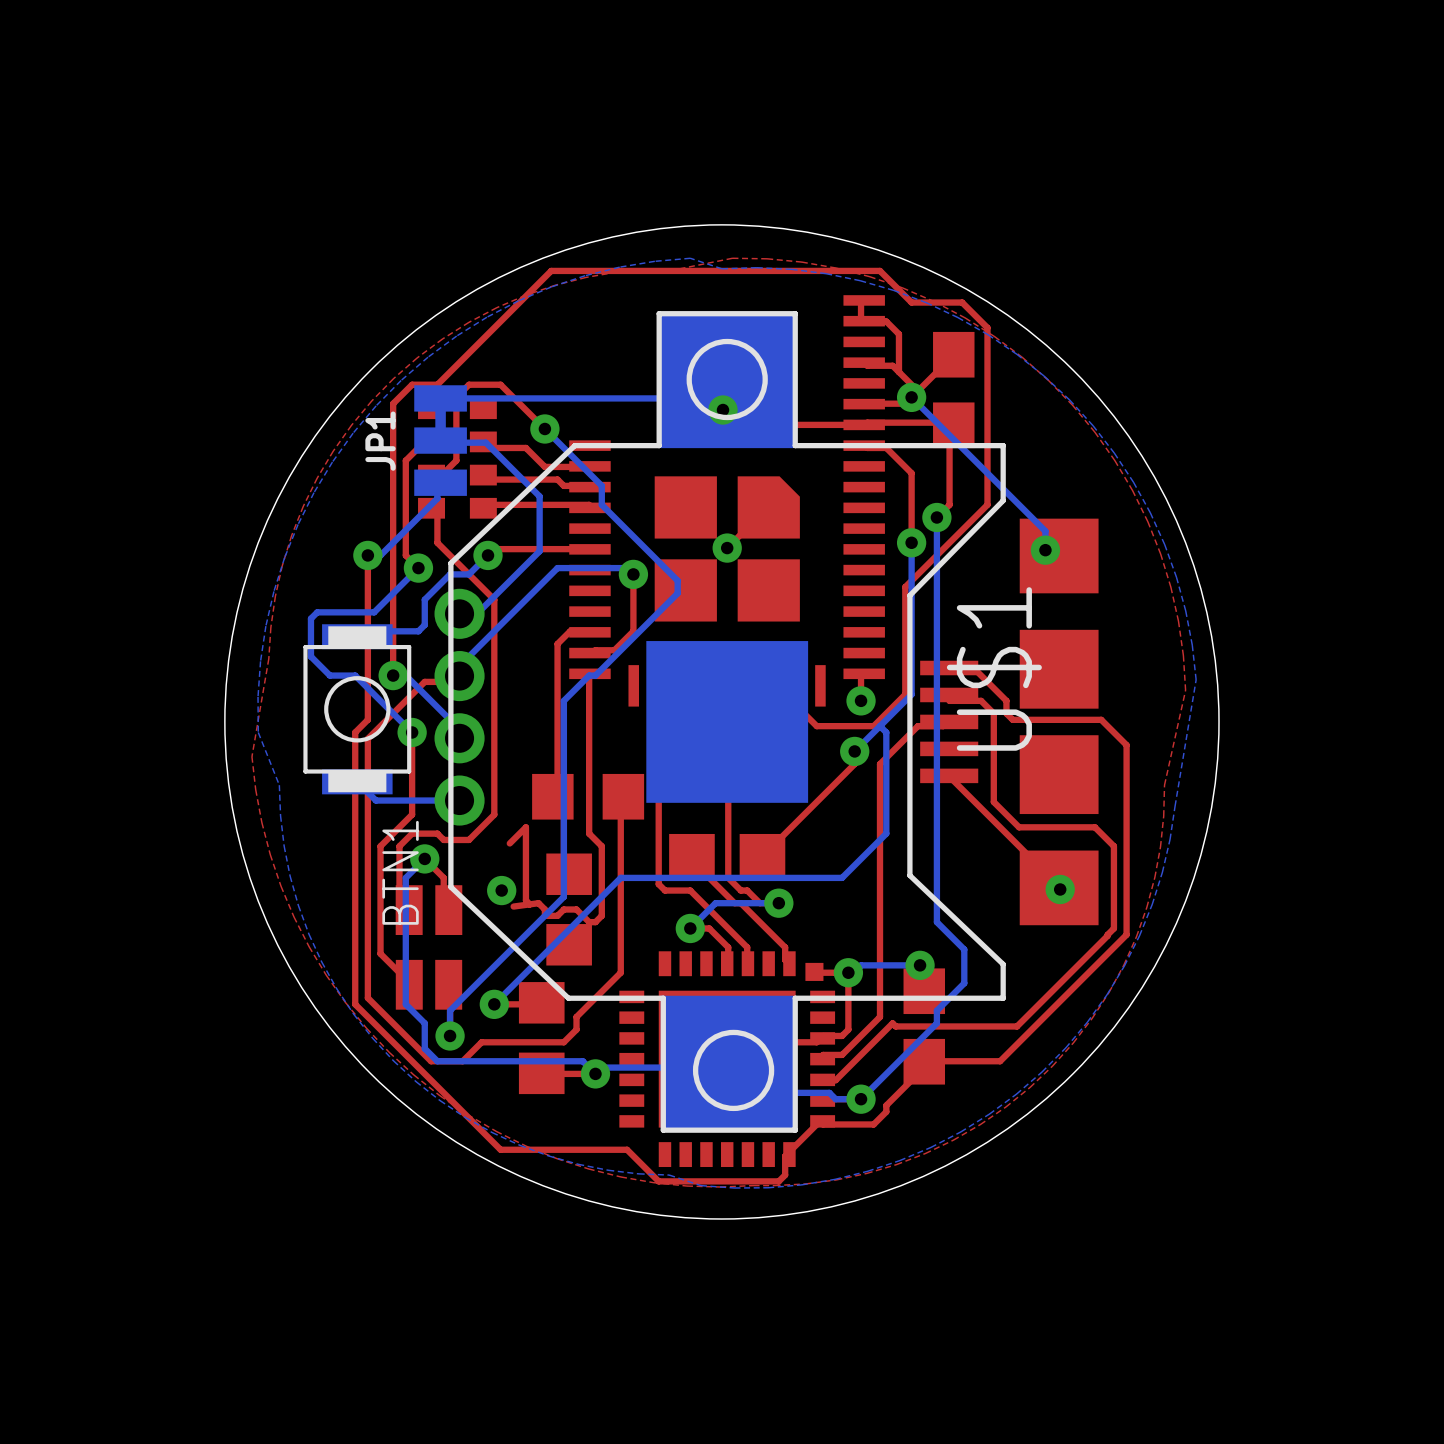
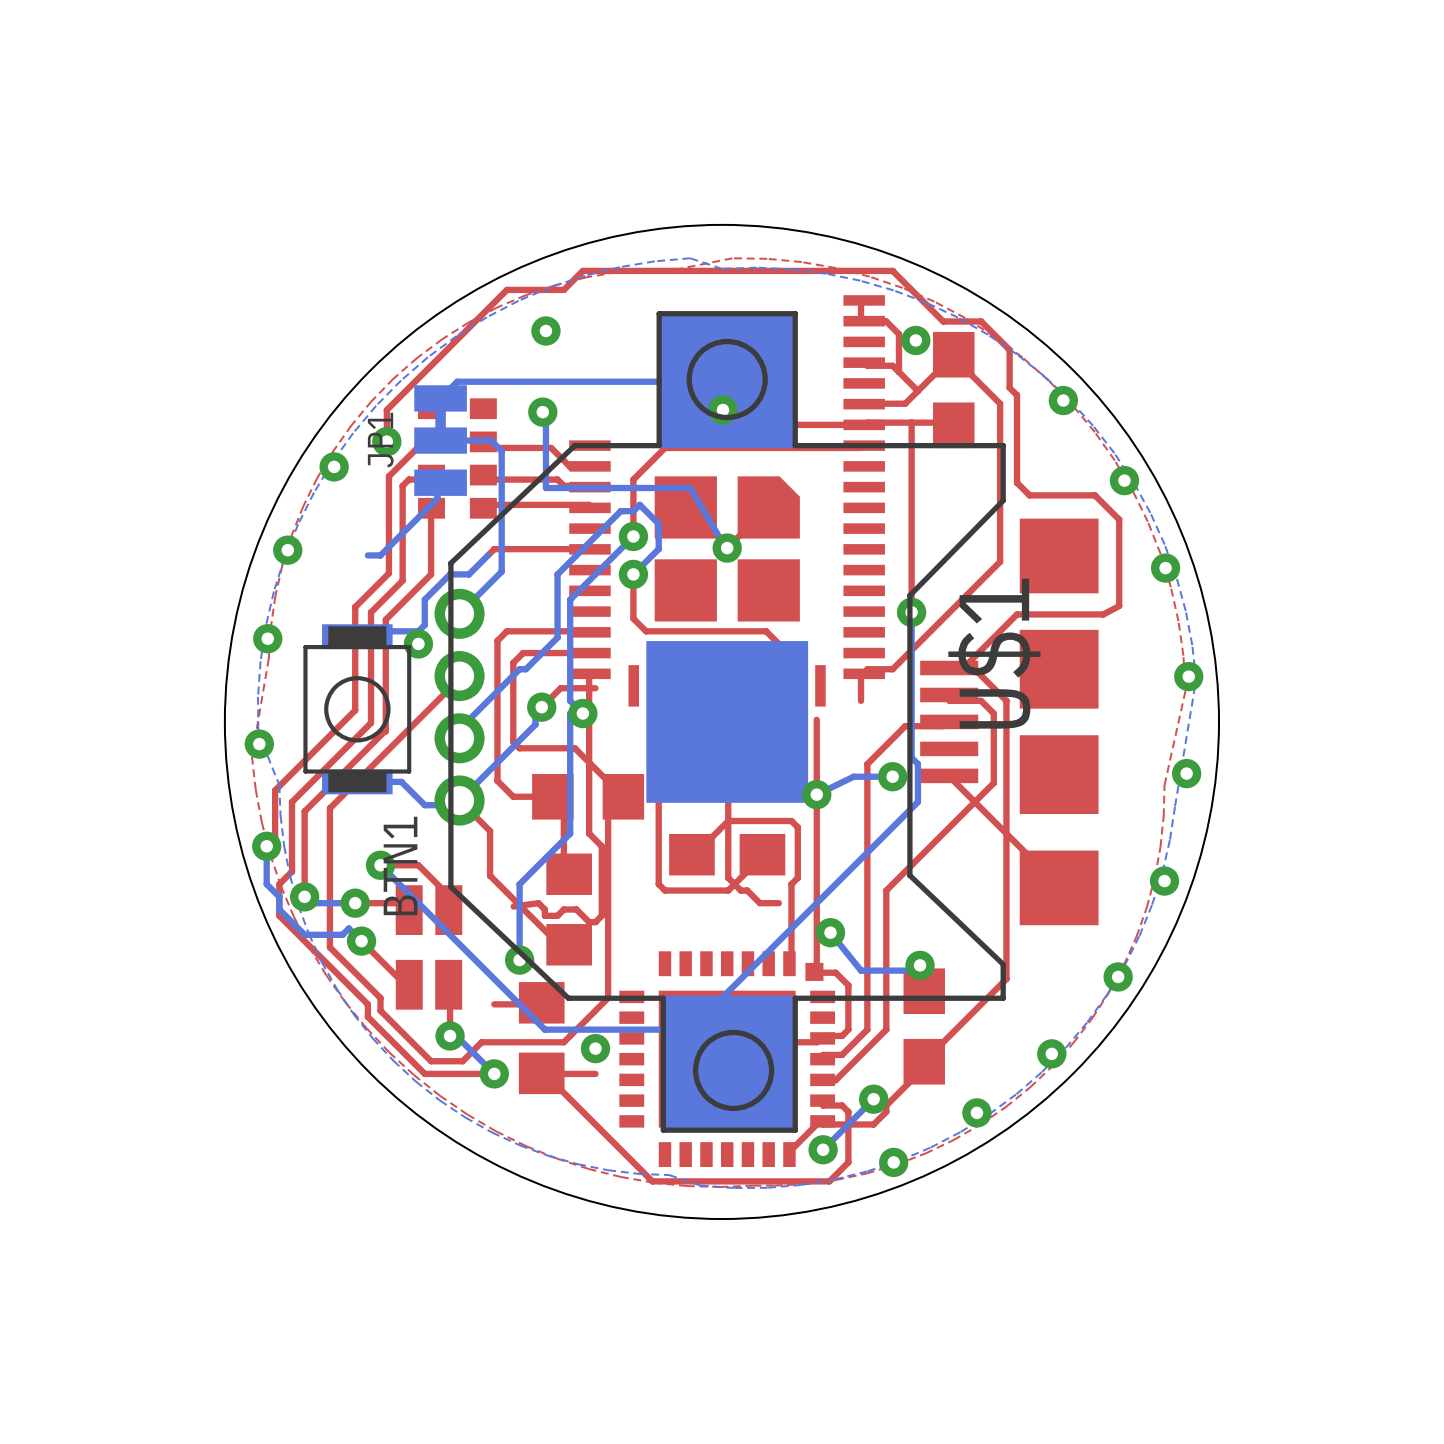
top track: (582, 270) (551, 270) (437, 384) (412, 384) -> (582, 270) (563, 289) (506, 289) (412, 384)
top track: (880, 270) (911, 302) (962, 302) (981, 321) -> (880, 270) (892, 270) (943, 321) (981, 321)
top track: (987, 327) (987, 504) (905, 587) (905, 694) (873, 726) (816, 726) (804, 713) (804, 688) (799, 685) -> (987, 327) (1009, 349) (1009, 387) (1016, 395) (1016, 482) (1029, 495) (1094, 495) (1119, 519) (1119, 606) (1103, 614) (1016, 614) (962, 669) (949, 668)
via: none -> (545, 330)
top track: none -> (953, 354) (955, 359) (1000, 403) (1000, 561) (892, 669) (867, 669) (864, 673)
bottom track: (911, 397) (1045, 531) (1045, 550) -> none
via position: (911, 397) -> (915, 340)
bottom track: (440, 398) (722, 398) (722, 410) (727, 410) -> (440, 398) (457, 381) (727, 381)
via: none -> (1063, 400)
top track: (393, 403) (393, 675) -> (393, 403) (386, 410) (386, 441)
bottom track: none -> (542, 412) (545, 412) (545, 488) (690, 488) (728, 552)
top track: (953, 425) (949, 428) (949, 504) (936, 517) -> none
top track: (544, 428) (500, 384) (469, 384) (456, 397) (456, 460) (443, 473) (431, 475) -> none
bottom track: (544, 428) (601, 485) (601, 504) (677, 580) (677, 593) (595, 675) (589, 675) (563, 700) (563, 896) (450, 1010) (450, 1035) -> none
via position: (544, 428) -> (542, 412)
bottom track: (440, 440) (442, 442) (485, 442) (539, 496) (539, 551) (477, 613) (459, 613) -> (440, 440) (491, 440) (501, 451) (501, 571) (459, 613)
via: none -> (386, 441)
top track: (864, 445) (867, 447) (886, 447) (911, 473) -> (911, 422) (911, 473)
top track: none -> (864, 445) (861, 447) (665, 447) (633, 479) (633, 536)
top track: (418, 447) (405, 460) (405, 555) (418, 568) -> (418, 447) (388, 476) (388, 573) (355, 607) (355, 710) (275, 790) (275, 837) (266, 846)
top track: (525, 447) (544, 466) (570, 466) -> (525, 447) (551, 447) (570, 466)
via: none -> (334, 466)
via: none -> (1124, 480)
top track: (431, 508) (437, 511) (437, 542) (494, 599) (494, 814) (469, 839) (443, 839) (437, 833) (412, 833) (399, 846) (399, 903) -> (431, 508) (431, 574) (385, 619) (385, 731) (304, 811) (304, 896)
bottom track: (936, 517) (936, 922) (964, 949) (964, 983) (936, 1010) (936, 1023) (861, 1099) (835, 1099) (829, 1092) (753, 1092) (728, 1067) (727, 1062) (721, 1067) (601, 1067) (595, 1073) (582, 1061) (437, 1061) (424, 1048) (424, 1023) (405, 1004) (405, 877) (424, 858) -> none
via: (936, 517) -> none
bottom track: none -> (633, 536) (570, 599) (570, 700) (582, 713)
via: none -> (633, 536)
top track: none -> (911, 542) (911, 612)
bottom track: (911, 542) (911, 612) -> none
via: (911, 542) -> none
via: none -> (287, 550)
via: (1045, 550) -> none
top track: (367, 555) (367, 719) (355, 732) (355, 1004) (367, 1016) -> (431, 475) (431, 479) (408, 479) (402, 485) (402, 580) (371, 612) (371, 722) (292, 802) (292, 871) (279, 884) (279, 915) (367, 1004) (367, 1016)
via: (367, 555) -> none
via: (488, 555) -> none
bottom track: (418, 568) (374, 612) (317, 612) (310, 618) (310, 656) (329, 675) (355, 675) (412, 732) -> none
via: (418, 568) -> none
via: none -> (1165, 568)
bottom track: (633, 574) (627, 568) (557, 568) (462, 662) (462, 675) (459, 676) -> (633, 574) (658, 549) (658, 523) (639, 504) (633, 511) (620, 511) (557, 574) (557, 637) (525, 669) (519, 669) (456, 732) (459, 738)
via: none -> (911, 612)
top track: (633, 618) (633, 631) (614, 650) (595, 650) (589, 653) -> (620, 795) (623, 796) (574, 748) (519, 748) (513, 741) (513, 662) (523, 653) (589, 653)
top track: none -> (633, 618) (646, 631) (766, 631) (797, 662) (797, 681) (799, 685)
top track: (570, 631) (557, 643) (557, 795) (552, 796) -> (570, 631) (506, 631) (497, 640) (497, 780) (513, 796) (552, 796) (544, 789)
via: none -> (267, 638)
via: none -> (418, 643)
bottom track: (393, 675) (399, 669) (462, 732) (459, 738) -> none
via: (393, 675) -> none
via: none -> (1188, 676)
top track: (456, 681) (424, 681) (367, 738) (367, 998) (380, 1010) -> (456, 681) (329, 808) (329, 947) (380, 998) (380, 1010)
top track: none -> (595, 688) (560, 688) (541, 707)
bottom track: (911, 694) (854, 751) -> none
via: (861, 700) -> none
via: none -> (541, 707)
bottom track: none -> (576, 707) (570, 713) (570, 833) (519, 884) (519, 960)
via: none -> (582, 713)
top track: (1006, 713) (1012, 719) (1101, 719) (1126, 745) (1126, 934) (1000, 1061) (924, 1061) -> (1006, 713) (1006, 979) (924, 1061)
top track: none -> (816, 719) (816, 966) (814, 971)
bottom track: (880, 726) (886, 732) (886, 833) -> (911, 694) (911, 757) (917, 764) (917, 802) (886, 833)
top track: (917, 726) (880, 764) (880, 1016) (867, 1029) -> (917, 726) (905, 726) (867, 764) (867, 1029)
top track: (412, 732) (412, 814) (380, 846) (380, 953) (409, 984) -> (361, 941) (405, 985) (409, 984)
via: (412, 732) -> none
via: none -> (259, 744)
top track: (854, 751) (854, 764) (762, 854) -> none
via: (854, 751) -> none
via: none -> (1186, 773)
bottom track: none -> (892, 776) (853, 776) (816, 794)
via: none -> (892, 776)
bottom track: (357, 781) (375, 800) (459, 800) -> (357, 781) (401, 781) (424, 805) (454, 805) (535, 724) (535, 715) (541, 707)
top track: (993, 783) (993, 802) (1019, 827) (1094, 827) (1113, 846) (1113, 928) (1016, 1026) (895, 1026) (892, 1023) (886, 1029) -> (993, 783) (886, 890) (886, 1029)
via: none -> (816, 794)
top track: none -> (459, 800) (490, 831) (490, 875) (555, 941) (570, 941) (569, 944)
top track: (620, 802) (620, 972) (576, 1016) (576, 1029) -> (620, 802) (608, 814) (608, 998) (576, 1029)
top track: (509, 843) (525, 827) (525, 900) (529, 904) -> none
bottom track: none -> (266, 846) (266, 884) (279, 896) (279, 909) (304, 934) (342, 934) (348, 928) (361, 941)
via: none -> (266, 846)
top track: (691, 854) (690, 858) (734, 903) (740, 903) (785, 947) (785, 960) (789, 963) -> (691, 854) (696, 852) (728, 820) (791, 820) (797, 827) (797, 877) (791, 884) (791, 960) (789, 963)
top track: (424, 858) (443, 877) (443, 890) -> (380, 865) (418, 865) (443, 890)
via: (424, 858) -> none
bottom track: none -> (380, 865) (544, 1029) (690, 1029)
via: none -> (380, 865)
bottom track: (842, 877) (620, 877) (494, 1004) -> (842, 877) (690, 1029)
via: none -> (1164, 881)
via: (1060, 889) -> none
via: (501, 890) -> none
top track: (690, 890) (747, 947) (747, 963) -> (690, 890) (728, 890) (762, 854)
bottom track: none -> (304, 896) (310, 903) (355, 903)
via: none -> (304, 896)
via: none -> (355, 903)
top track: none -> (399, 903) (355, 903)
bottom track: (778, 903) (715, 903) (690, 928) -> none
via: (778, 903) -> none
top track: (690, 928) (709, 928) (728, 947) (727, 963) -> none
via: (690, 928) -> none
bottom track: none -> (830, 932) (861, 970) (925, 970)
via: none -> (830, 932)
via: none -> (361, 941)
via: none -> (519, 960)
bottom track: (920, 965) (861, 965) (852, 973) (848, 972) -> none
via: (848, 972) -> none
via: none -> (1118, 976)
via: (494, 1004) -> none
bottom track: none -> (456, 1035) (494, 1073)
via: none -> (1051, 1053)
top track: (424, 1073) (500, 1149) (627, 1149) (658, 1181) -> (544, 1073) (652, 1181) (658, 1181)
top track: none -> (494, 1073) (424, 1073)
via: none -> (494, 1073)
via position: (595, 1073) -> (595, 1048)
via position: (861, 1099) -> (873, 1099)
bottom track: none -> (873, 1099) (823, 1149)
via: none -> (976, 1112)
via: none -> (823, 1149)
top track: (789, 1154) (785, 1156) (785, 1175) (778, 1181) -> (822, 1100) (823, 1105) (842, 1105) (848, 1111) (848, 1162) (829, 1181) (778, 1181)
via: none -> (893, 1162)

